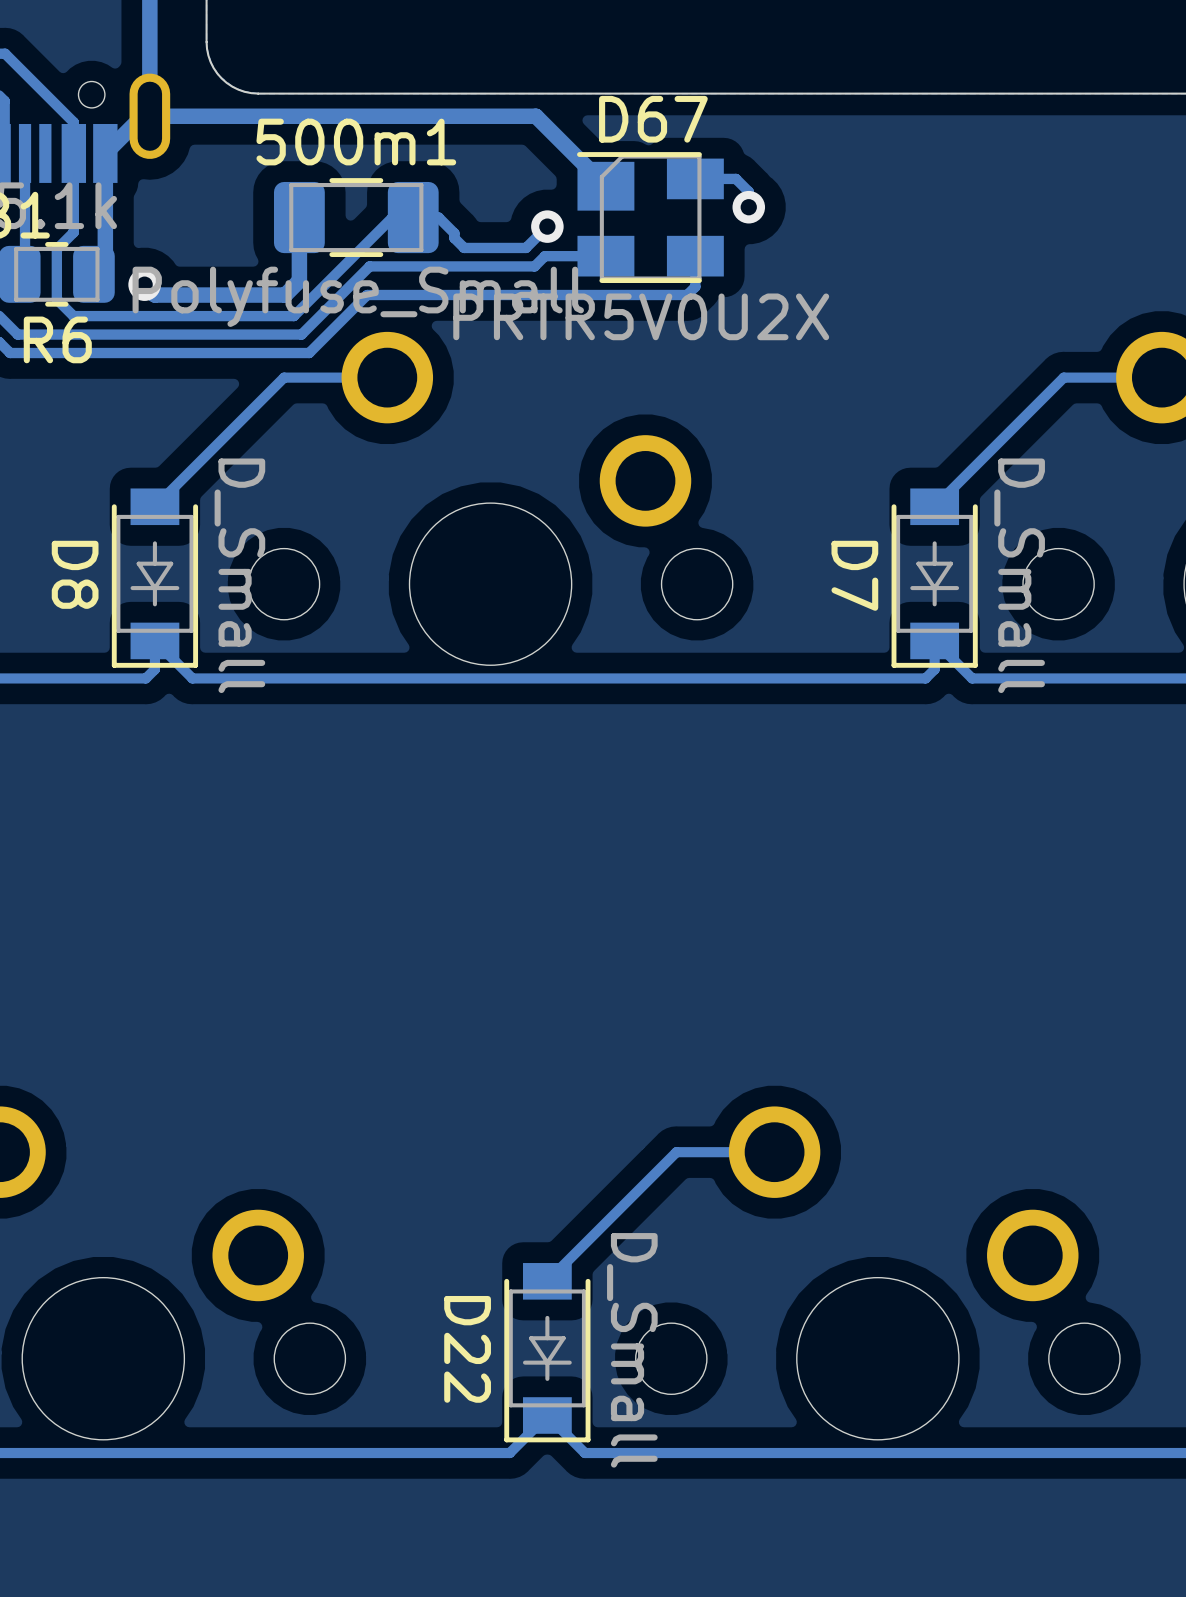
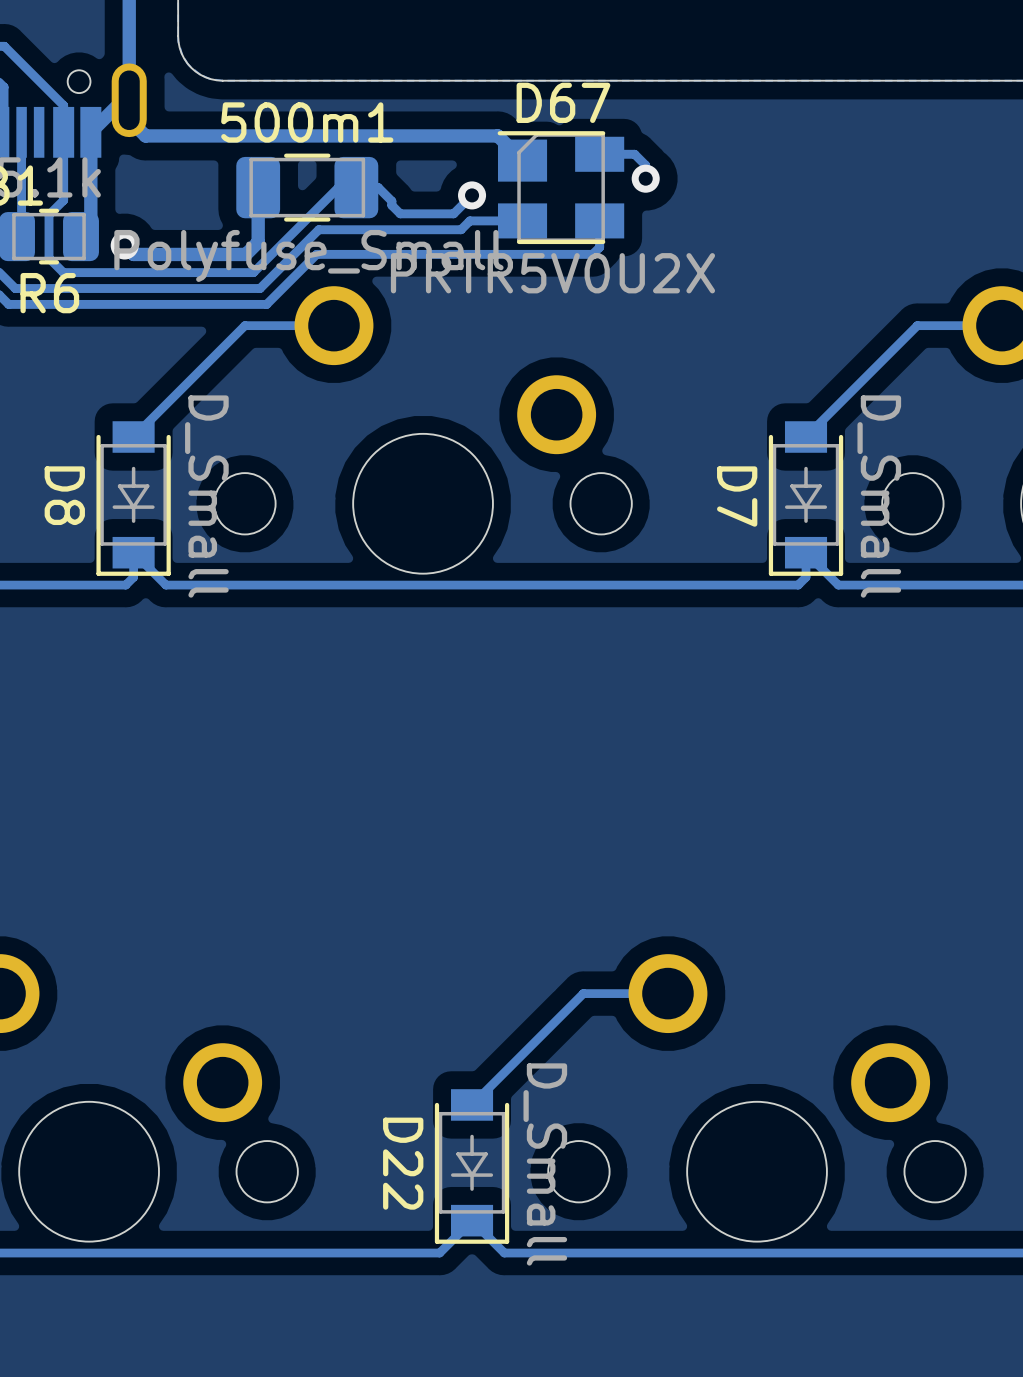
track: (149, 116) (535, 116) (577, 157) -> (129, 100) (129, 119) (145, 135) (497, 135)

